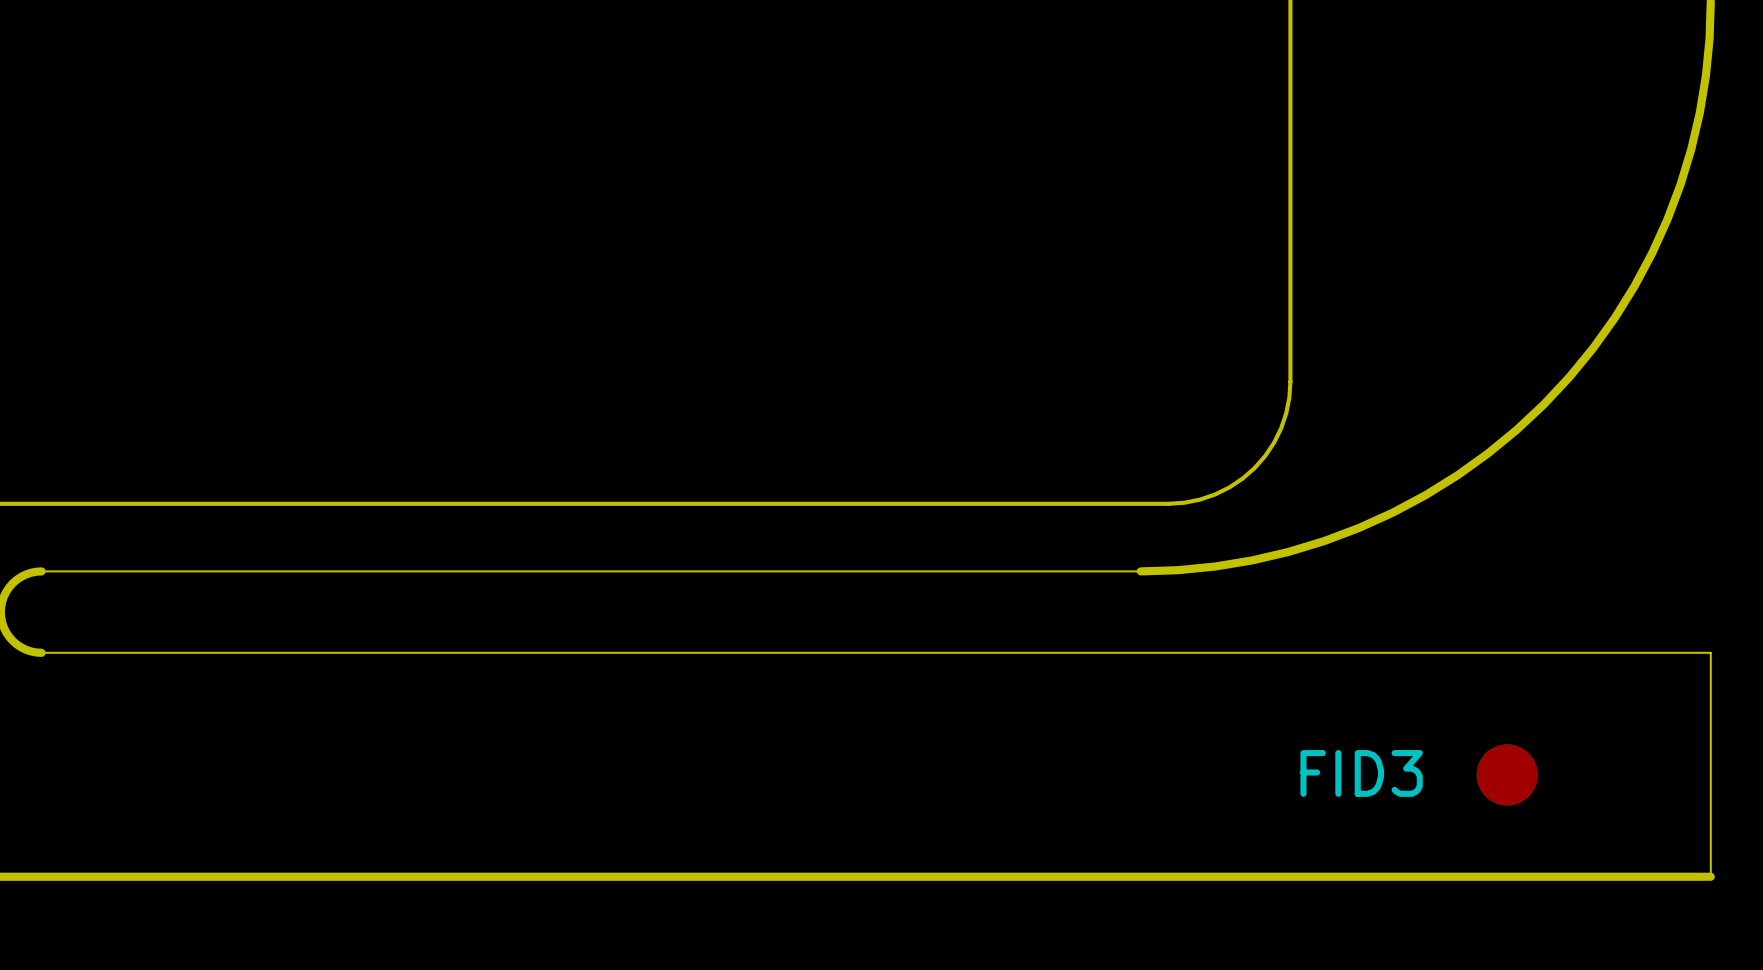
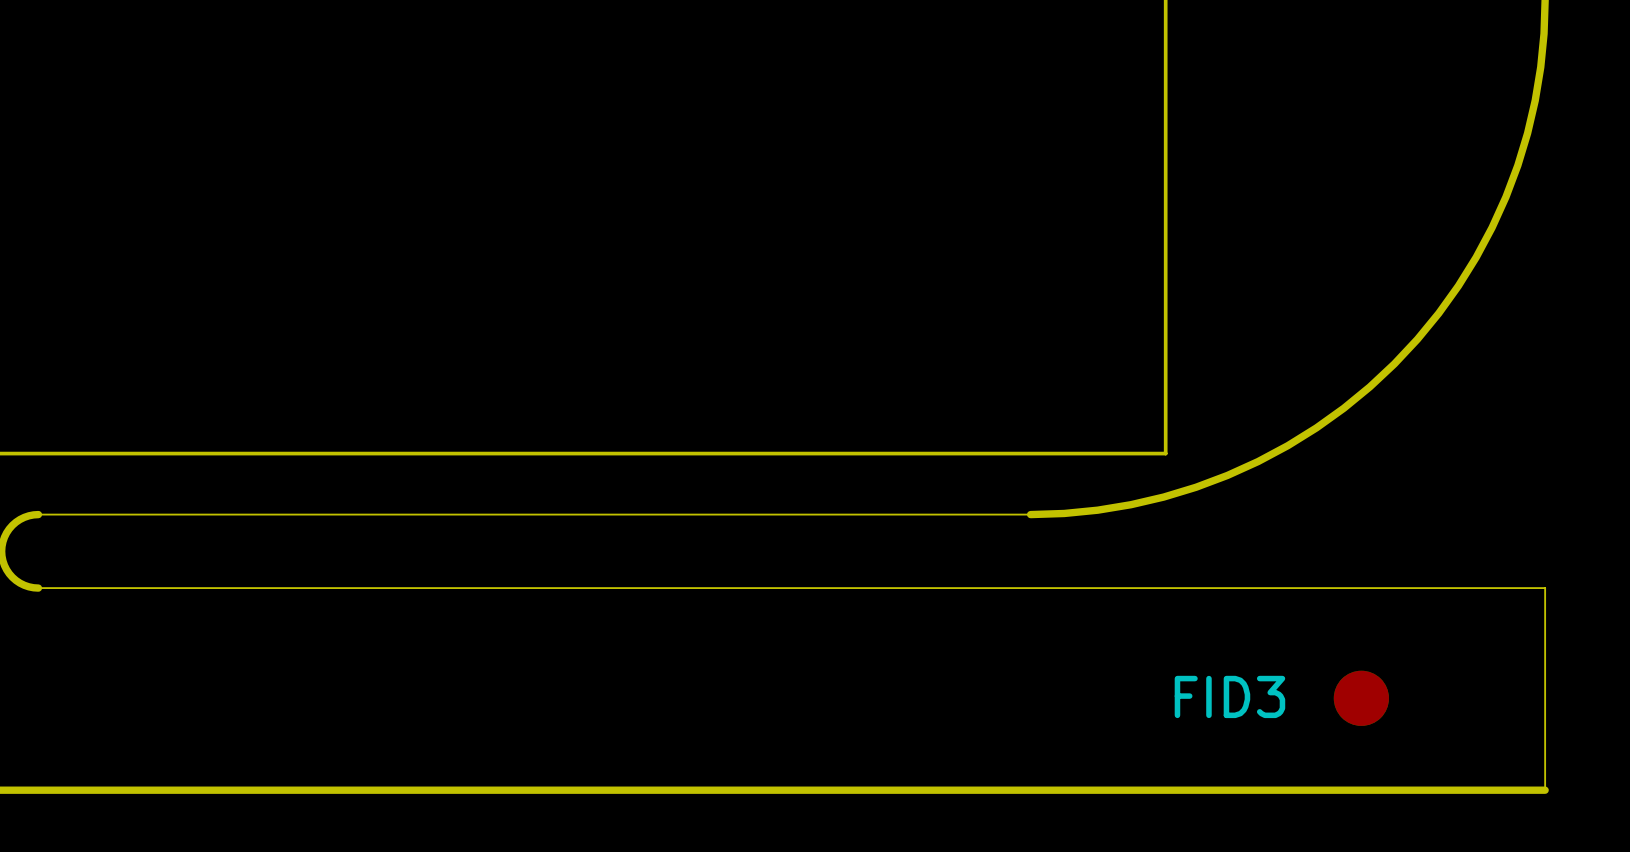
board edge: (1290, 381) (1289, 397) (1281, 428) (1274, 442) (1254, 468) (1229, 487) (1215, 494) (1199, 499) (1168, 503) -> (1165, 343) (1165, 453) (1055, 453)

